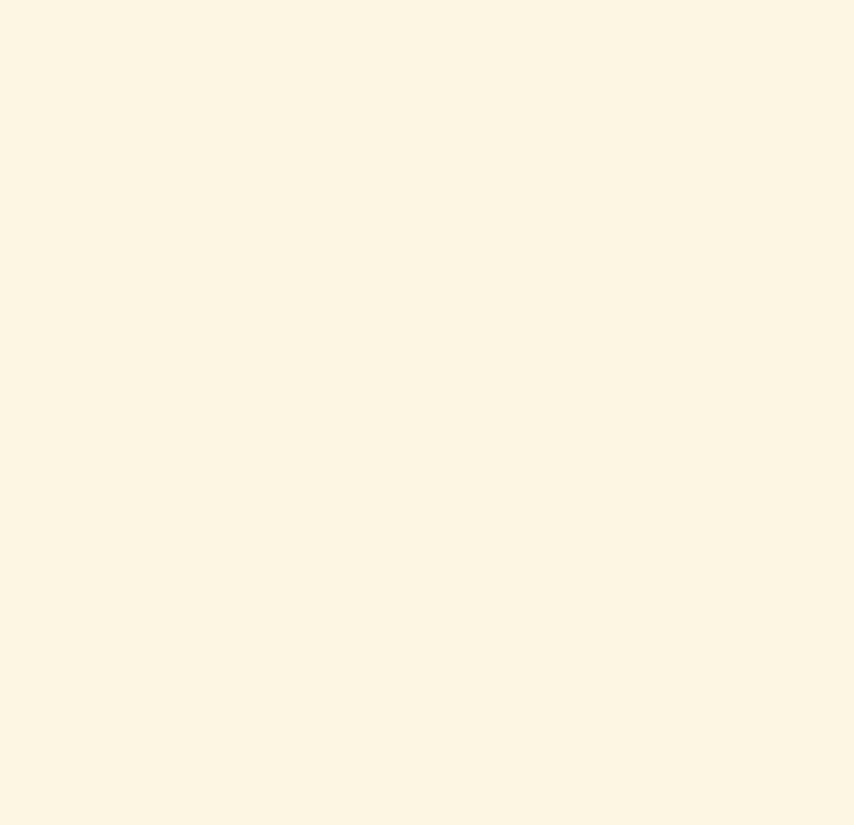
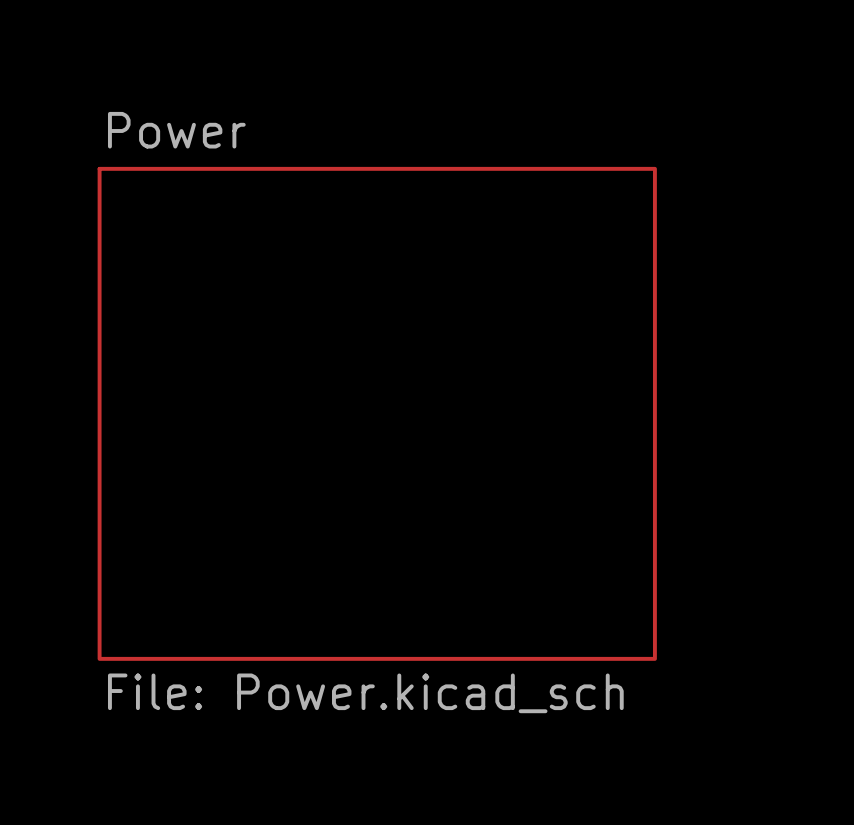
sheet Power: none -> File: Power.kicad_sch (377, 413)

